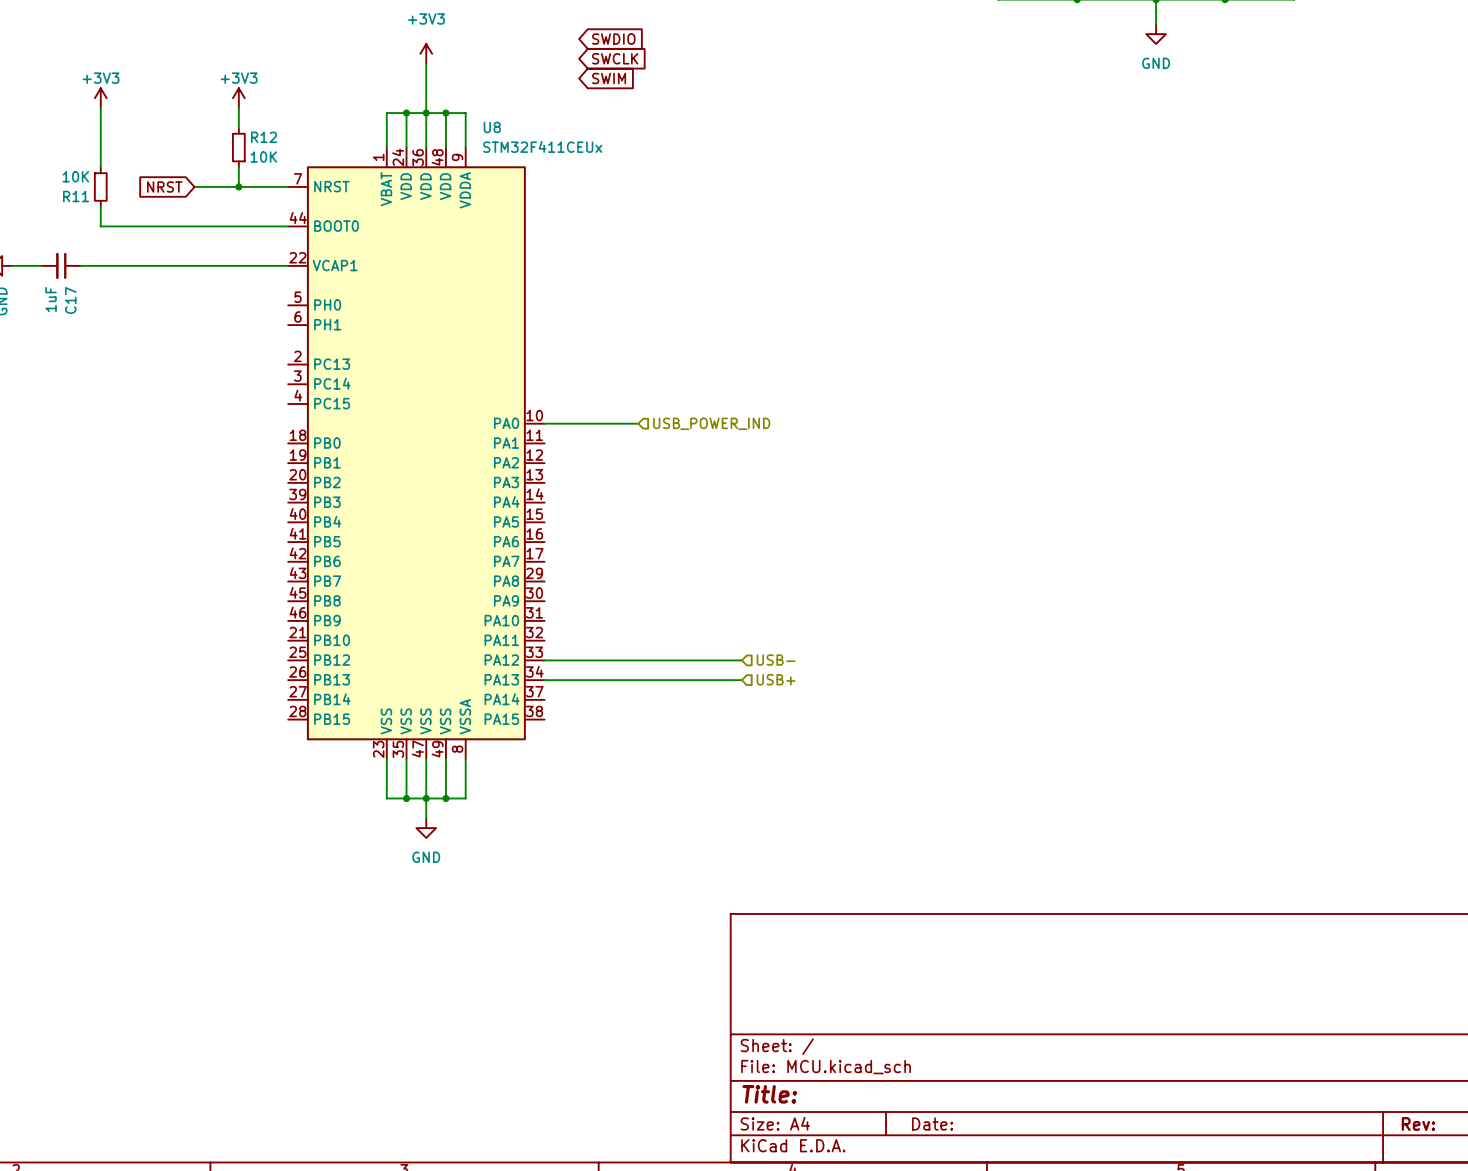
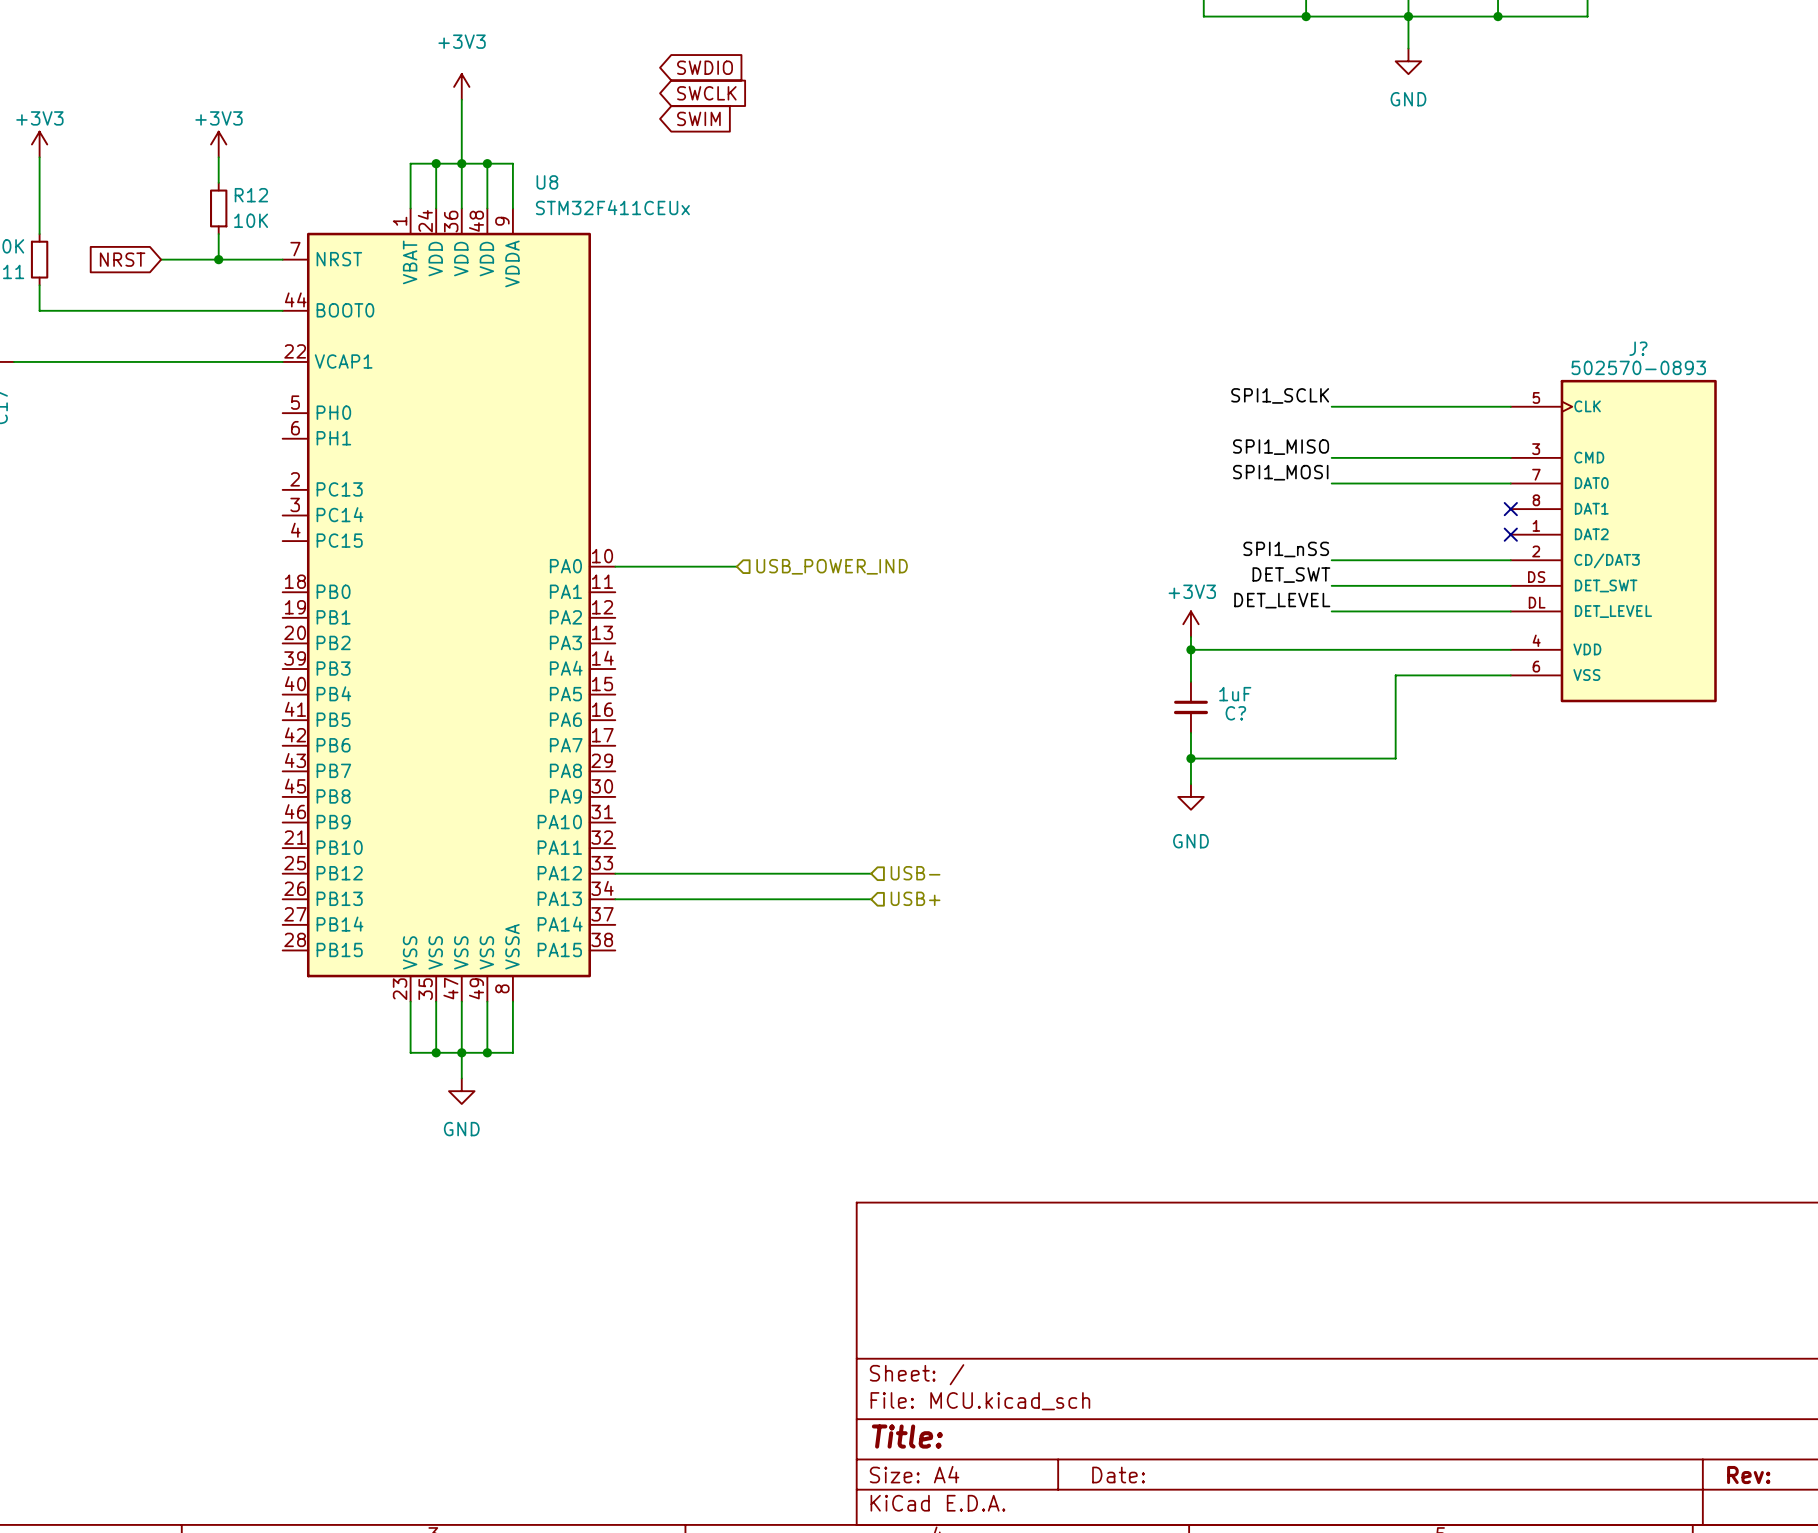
label: none -> SPI1_SCLK (1280, 395)
wire: none -> (1331, 406) (1510, 406)
label: none -> SPI1_MISO (1281, 447)
wire: none -> (1331, 457) (1510, 457)
label: none -> SPI1_MOSI (1280, 472)
wire: none -> (1331, 483) (1510, 483)
no-connect mark: none -> (1510, 509)
no-connect mark: none -> (1510, 534)
J?: none -> 502570-0893 (1613, 541)
label: none -> SPI1_nSS (1286, 549)
wire: none -> (1331, 560) (1510, 560)
label: none -> DET_SWT (1291, 575)
wire: none -> (1331, 585) (1510, 585)
label: none -> DET_LEVEL (1282, 600)
wire: none -> (1331, 611) (1510, 611)
power symbol: none -> +3V3 (1190, 624)
wire: none -> (1190, 637) (1190, 681)
wire: none -> (1190, 649) (1510, 649)
junction: none -> (1190, 649)
wire: none -> (1510, 675) (1395, 675) (1395, 758) (1190, 758)
C?: none -> 1uF (1190, 707)
wire: none -> (1190, 732) (1190, 784)
junction: none -> (1190, 758)
power symbol: none -> GND (1190, 796)

